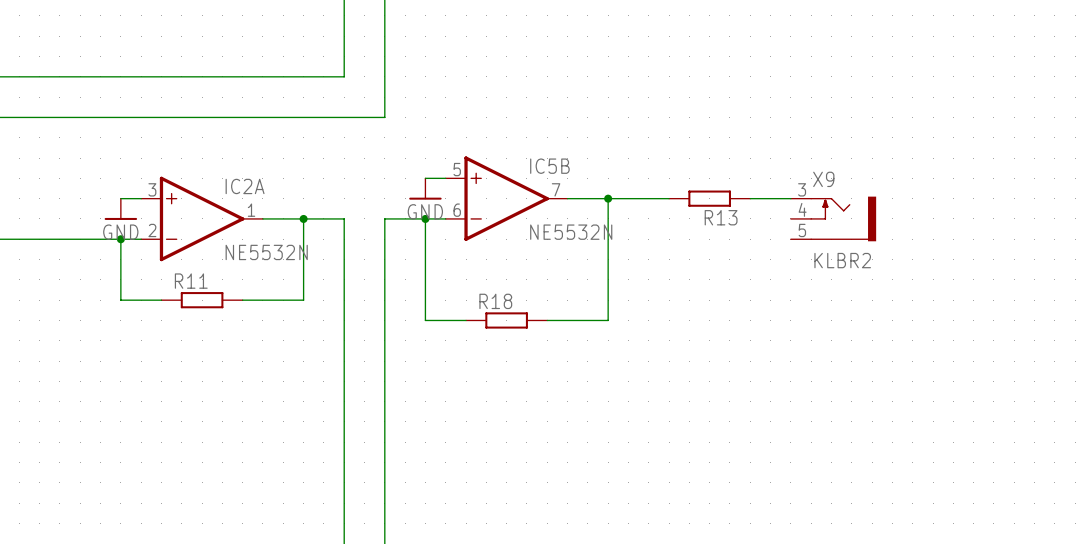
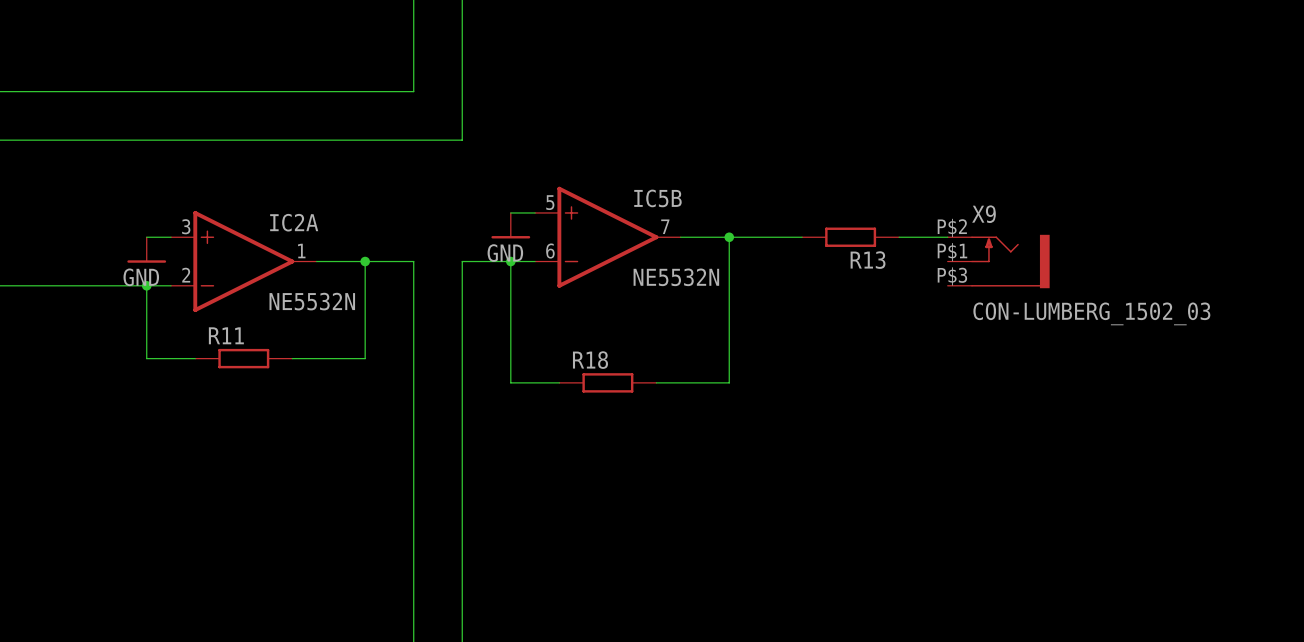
X9 pin number: 3 (802, 189) -> P$2 (952, 227)
X9 pin number: 4 (802, 209) -> P$1 (952, 252)
X9 pin number: 5 (802, 230) -> P$3 (952, 276)
X9 value: KLBR2 (842, 260) -> CON-LUMBERG_1502_03 (1091, 313)

